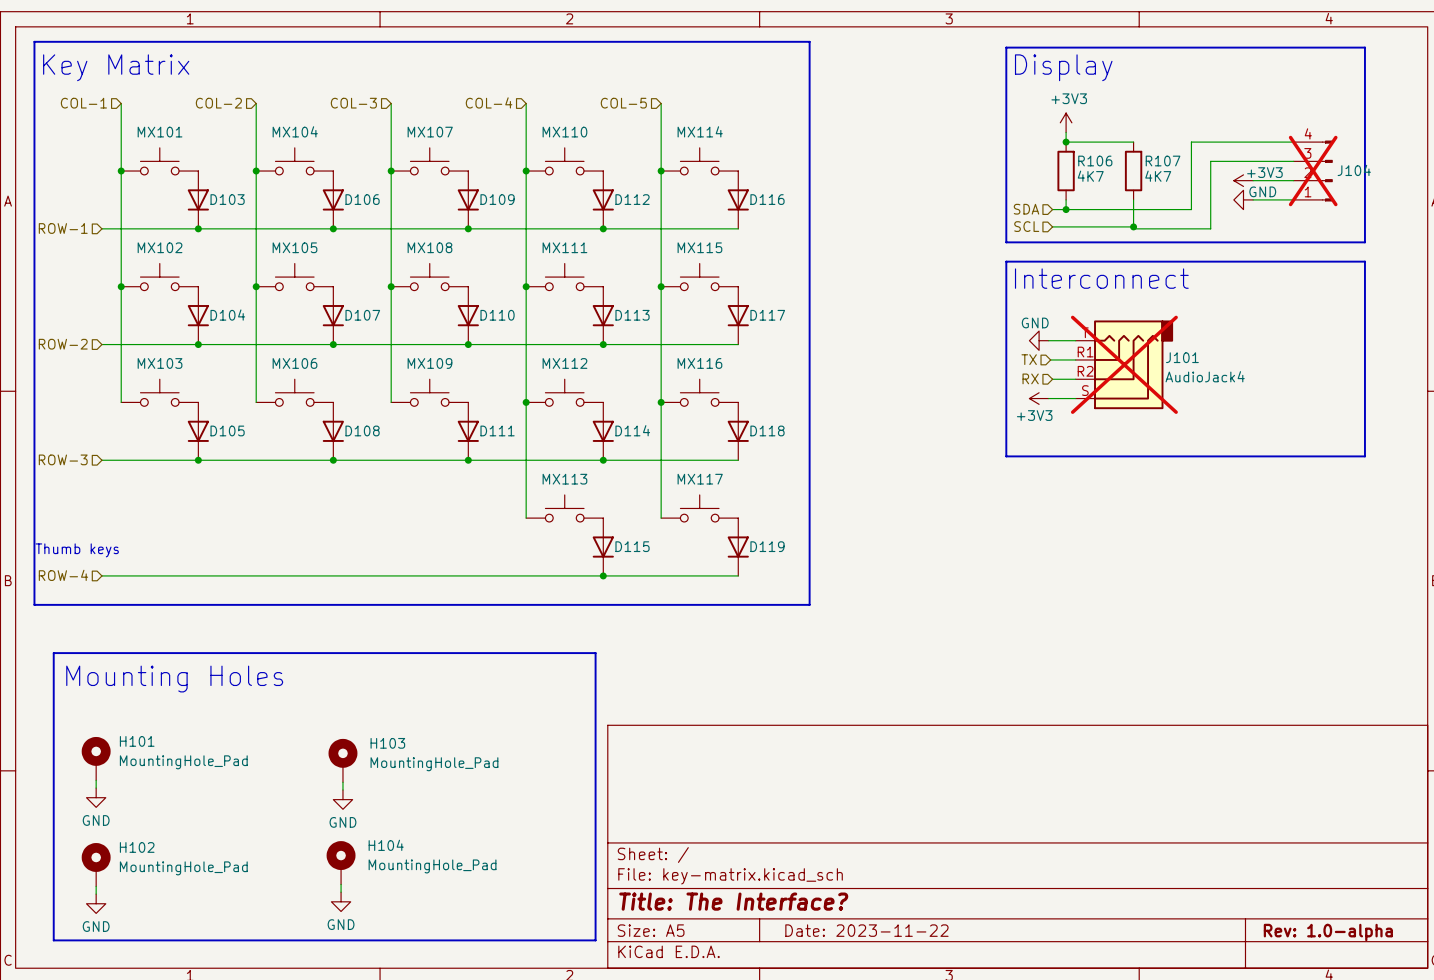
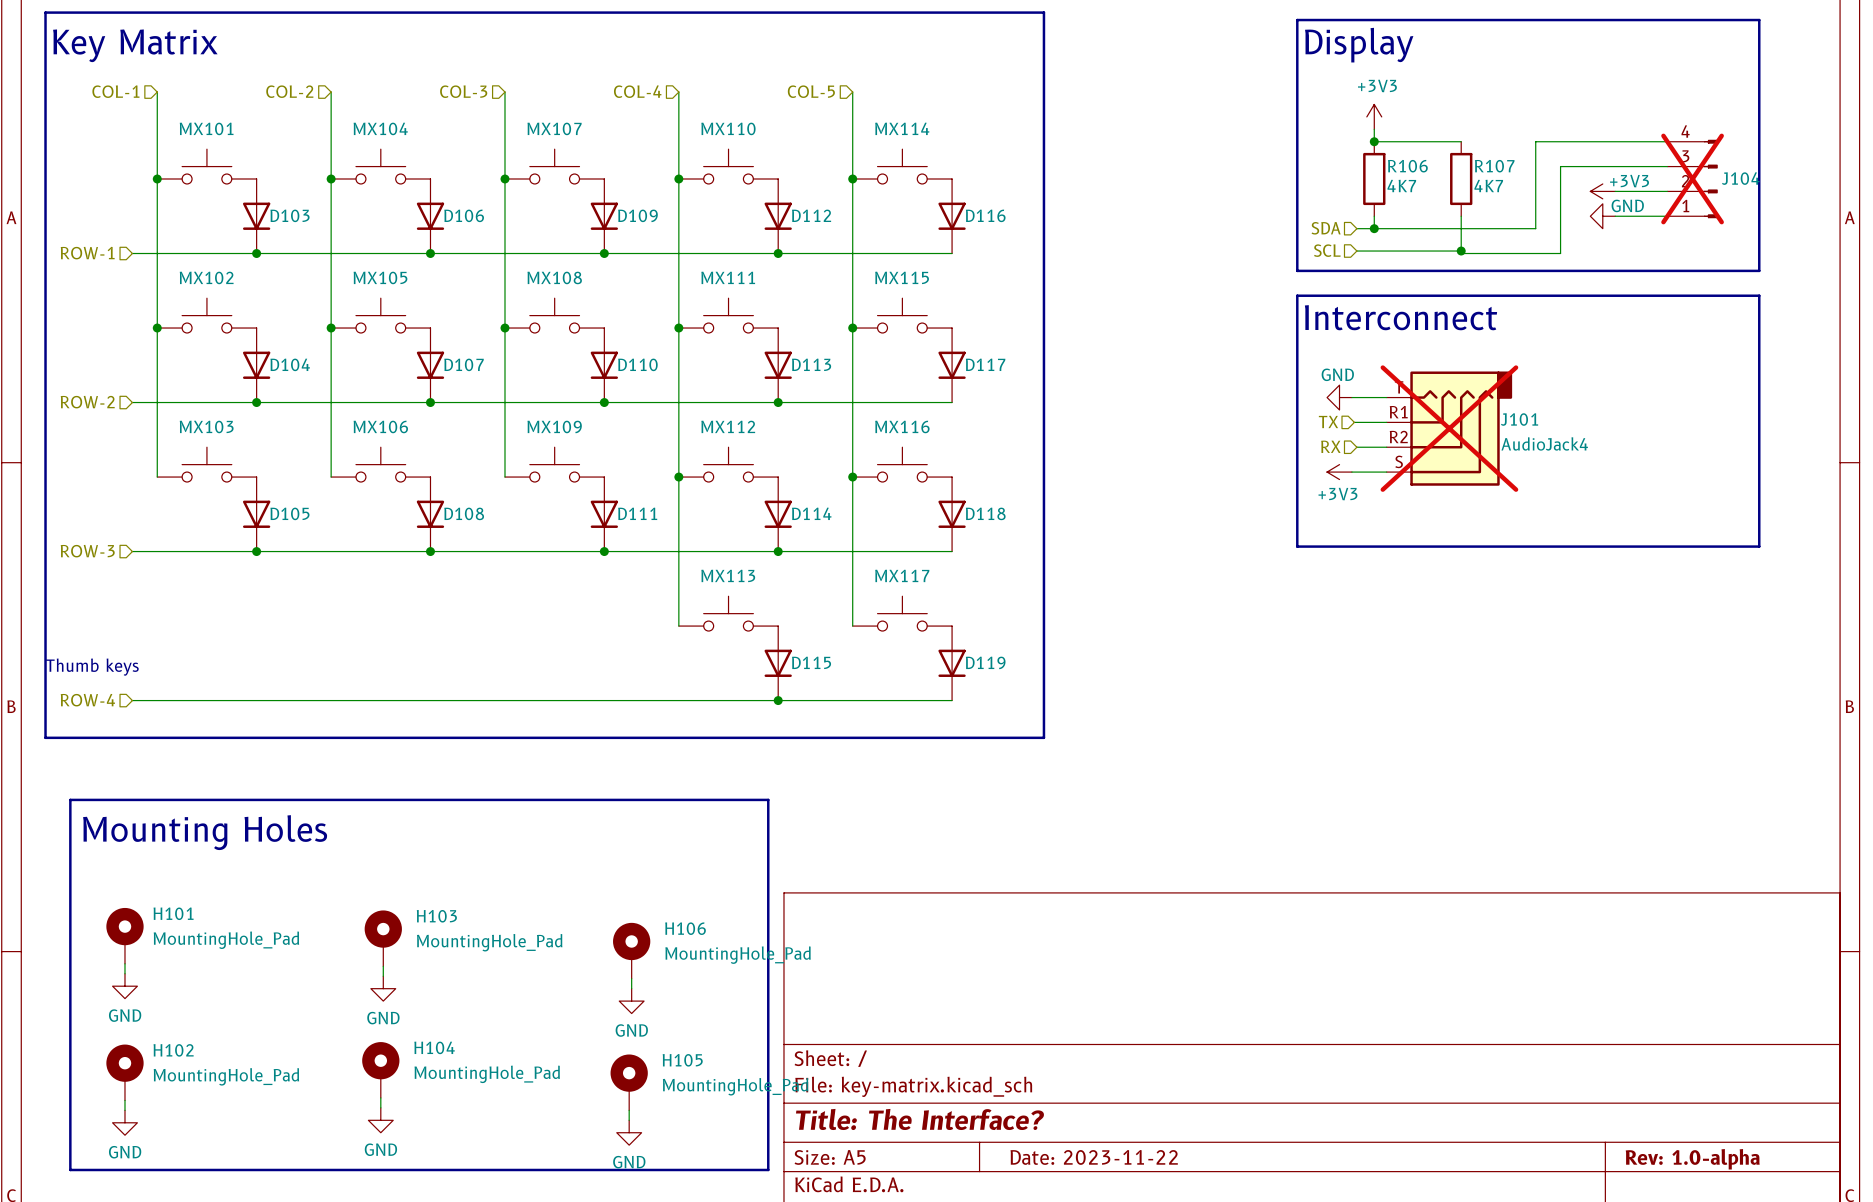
H103 position: (342, 760) -> (383, 938)
H106: none -> MountingHole_Pad (631, 950)
wire: (342, 782) (342, 789) -> (383, 966) (383, 976)
wire: none -> (631, 978) (631, 988)
power symbol position: GND (342, 799) -> GND (383, 988)
power symbol: none -> GND (631, 1001)
H104 position: (341, 862) -> (380, 1070)
H105: none -> MountingHole_Pad (629, 1082)
wire: (341, 884) (341, 892) -> (380, 1097) (380, 1107)
wire: none -> (629, 1110) (629, 1120)
power symbol position: GND (341, 901) -> GND (380, 1120)
power symbol: none -> GND (629, 1132)

